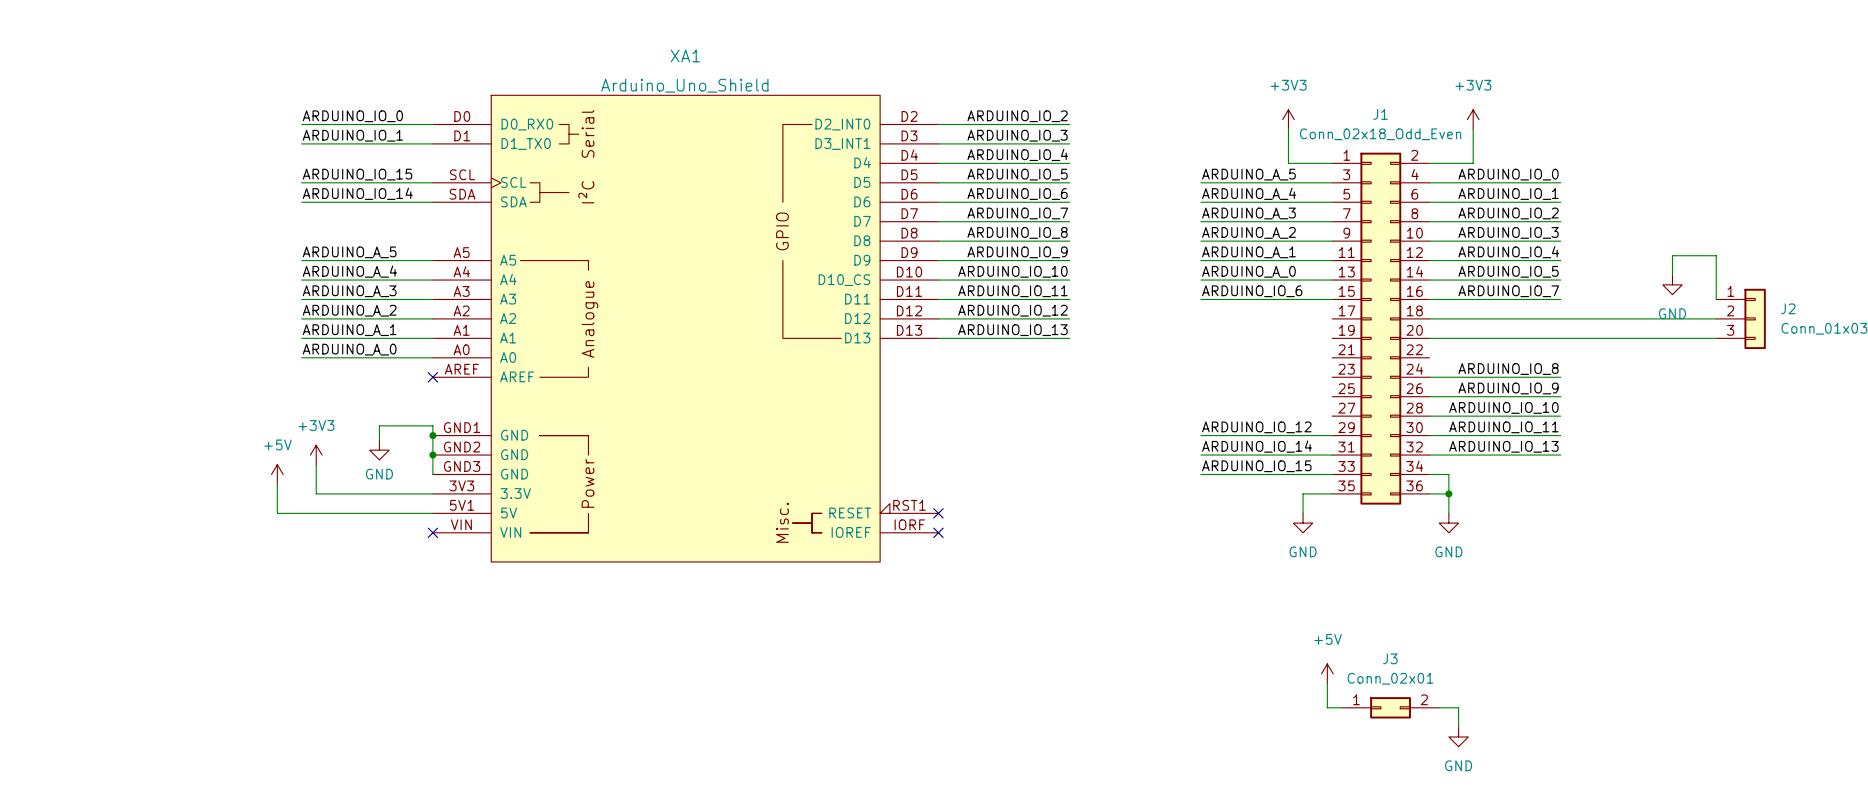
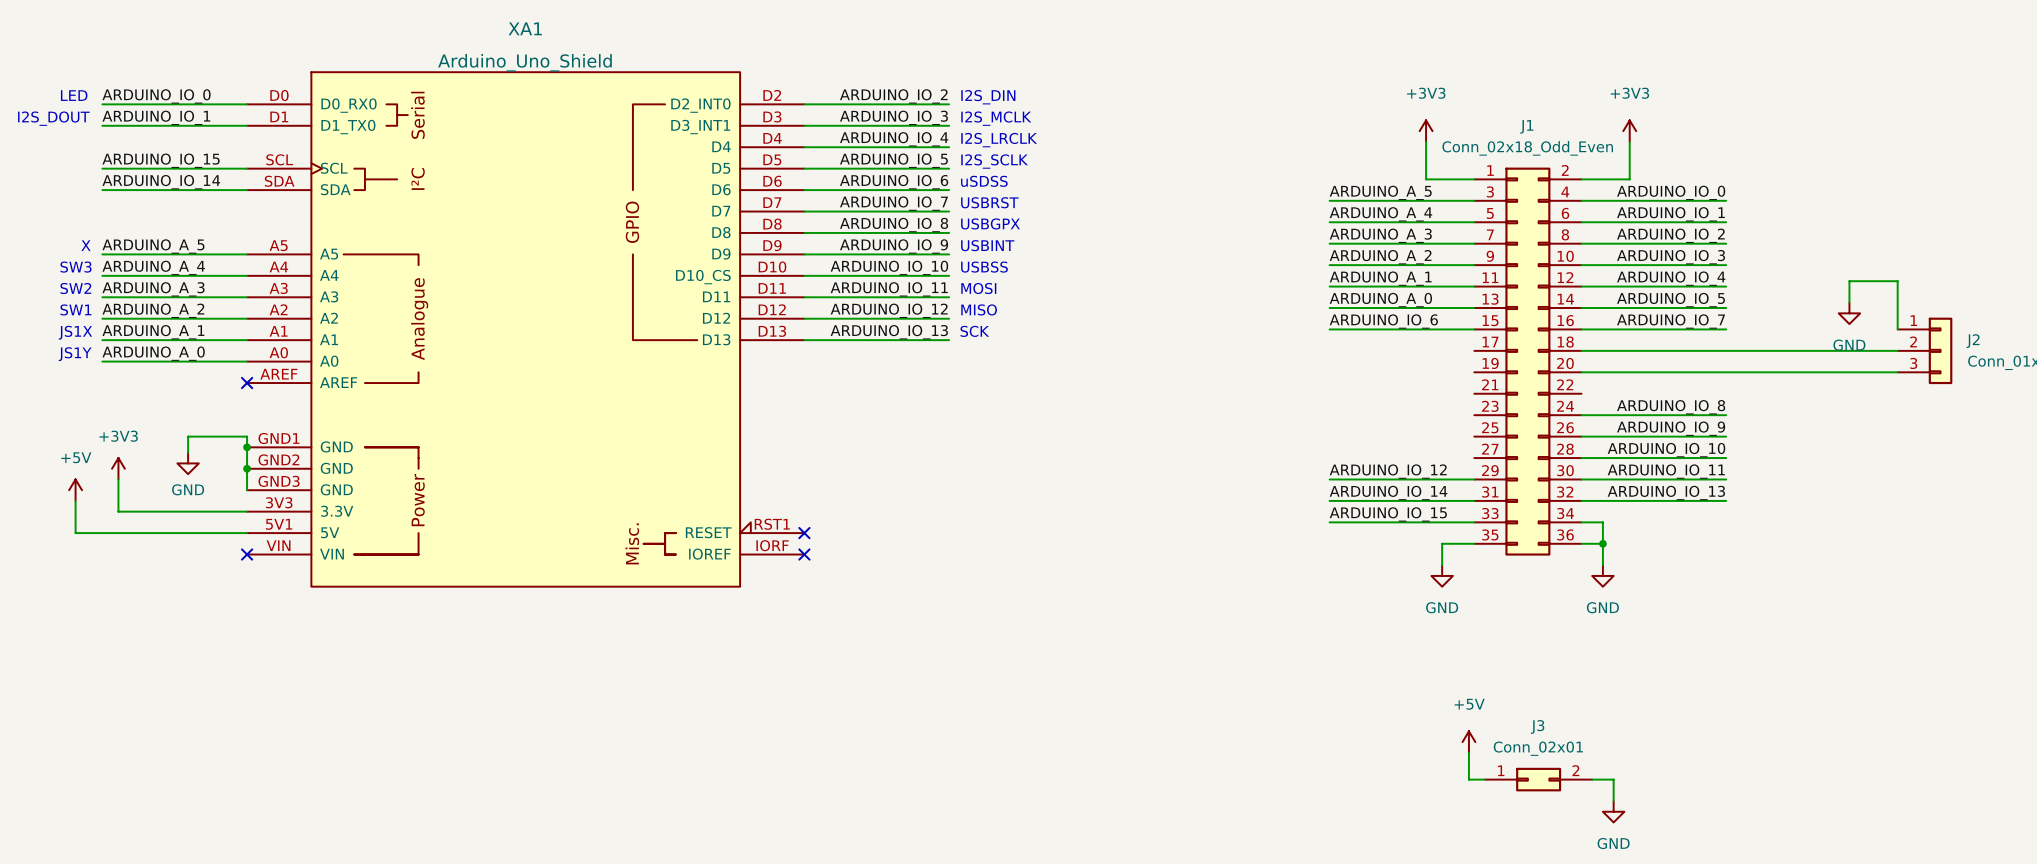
text: none -> LED (74, 95)
label: none -> ARDUINO_IO_0 (156, 96)
label: none -> ARDUINO_IO_2 (893, 96)
text: none -> I2S_DIN (988, 97)
wire: none -> (102, 104) (247, 104)
label: none -> ARDUINO_IO_1 (156, 117)
label: none -> ARDUINO_IO_3 (893, 117)
text: none -> I2S_DOUT (53, 118)
text: none -> I2S_MCLK (996, 118)
wire: none -> (102, 125) (247, 125)
label: ARDUINO_IO_0 (352, 116) -> none
label: ARDUINO_IO_2 (1017, 116) -> none
wire: (938, 124) (1069, 124) -> none
label: none -> ARDUINO_IO_4 (894, 139)
text: none -> I2S_LRCLK (999, 140)
label: ARDUINO_IO_1 (352, 135) -> none
label: ARDUINO_IO_3 (1017, 135) -> none
wire: (938, 143) (1069, 143) -> none
label: none -> ARDUINO_IO_15 (161, 160)
label: none -> ARDUINO_IO_5 (893, 160)
text: none -> I2S_SCLK (994, 161)
wire: none -> (102, 168) (247, 168)
label: ARDUINO_IO_4 (1017, 154) -> none
wire: (938, 163) (1069, 163) -> none
label: none -> ARDUINO_IO_14 (161, 182)
label: none -> ARDUINO_IO_6 (894, 182)
text: none -> uSDSS (984, 181)
wire: none -> (102, 190) (247, 190)
label: ARDUINO_IO_15 (357, 174) -> none
label: ARDUINO_IO_5 (1017, 174) -> none
wire: (938, 182) (1069, 182) -> none
label: none -> ARDUINO_IO_7 (893, 203)
text: none -> USBRST (989, 202)
label: ARDUINO_IO_14 (357, 193) -> none
label: ARDUINO_IO_6 (1017, 194) -> none
wire: (938, 202) (1069, 202) -> none
label: none -> ARDUINO_IO_8 (894, 225)
text: none -> USBGPX (990, 223)
label: ARDUINO_IO_7 (1017, 213) -> none
wire: (938, 221) (1069, 221) -> none
text: none -> X (85, 245)
label: none -> ARDUINO_A_5 (153, 246)
label: none -> ARDUINO_IO_9 (894, 246)
text: none -> USBINT (987, 245)
wire: none -> (102, 254) (247, 254)
label: ARDUINO_IO_8 (1017, 232) -> none
wire: (938, 241) (1069, 241) -> none
text: none -> SW3 (76, 267)
label: none -> ARDUINO_A_4 (153, 267)
label: none -> ARDUINO_IO_10 (889, 267)
text: none -> USBSS (984, 267)
wire: none -> (102, 275) (247, 275)
label: ARDUINO_A_5 (349, 252) -> none
label: ARDUINO_IO_9 (1017, 252) -> none
wire: (938, 260) (1069, 260) -> none
text: none -> SW2 (75, 288)
label: none -> ARDUINO_A_3 (153, 289)
label: none -> ARDUINO_IO_11 (889, 289)
text: none -> MOSI (978, 288)
wire: none -> (102, 297) (247, 297)
label: ARDUINO_A_4 (349, 271) -> none
label: ARDUINO_IO_10 (1012, 271) -> none
wire: (938, 280) (1069, 280) -> none
text: none -> SW1 (75, 309)
label: none -> ARDUINO_A_2 (153, 310)
label: none -> ARDUINO_IO_12 (889, 310)
text: none -> MISO (979, 309)
wire: none -> (102, 318) (247, 318)
label: ARDUINO_A_3 (349, 291) -> none
label: ARDUINO_IO_11 (1012, 291) -> none
wire: (938, 299) (1069, 299) -> none
label: none -> ARDUINO_A_1 (153, 332)
label: none -> ARDUINO_IO_13 (889, 332)
text: none -> JS1X (75, 332)
text: none -> SCK (974, 331)
wire: none -> (102, 340) (247, 340)
label: ARDUINO_A_2 (349, 310) -> none
label: ARDUINO_IO_12 (1012, 310) -> none
wire: (938, 318) (1069, 318) -> none
text: none -> JS1Y (75, 354)
label: none -> ARDUINO_A_0 (153, 353)
wire: none -> (102, 361) (247, 361)
XA1 position: (685, 328) -> (525, 329)
label: ARDUINO_A_1 (349, 330) -> none
label: ARDUINO_IO_13 (1012, 330) -> none
wire: (938, 338) (1069, 338) -> none
no-connect mark: none -> (247, 383)
label: ARDUINO_A_0 (349, 349) -> none
no-connect mark: (432, 377) -> none
junction: none -> (247, 447)
wire: none -> (188, 452) (188, 436) (247, 436) (247, 490)
power symbol: none -> GND (188, 463)
power symbol: none -> +3V3 (118, 468)
junction: none -> (247, 468)
wire: none -> (118, 479) (118, 511) (247, 511)
junction: (432, 435) -> none
power symbol: none -> +5V (75, 490)
power symbol: GND (379, 450) -> none
wire: none -> (75, 500) (75, 533) (247, 533)
power symbol: +3V3 (316, 455) -> none
junction: (432, 455) -> none
power symbol: +5V (277, 474) -> none
no-connect mark: none -> (804, 533)
no-connect mark: none -> (247, 554)
no-connect mark: none -> (804, 554)
no-connect mark: (938, 513) -> none
no-connect mark: (432, 532) -> none
no-connect mark: (938, 532) -> none

